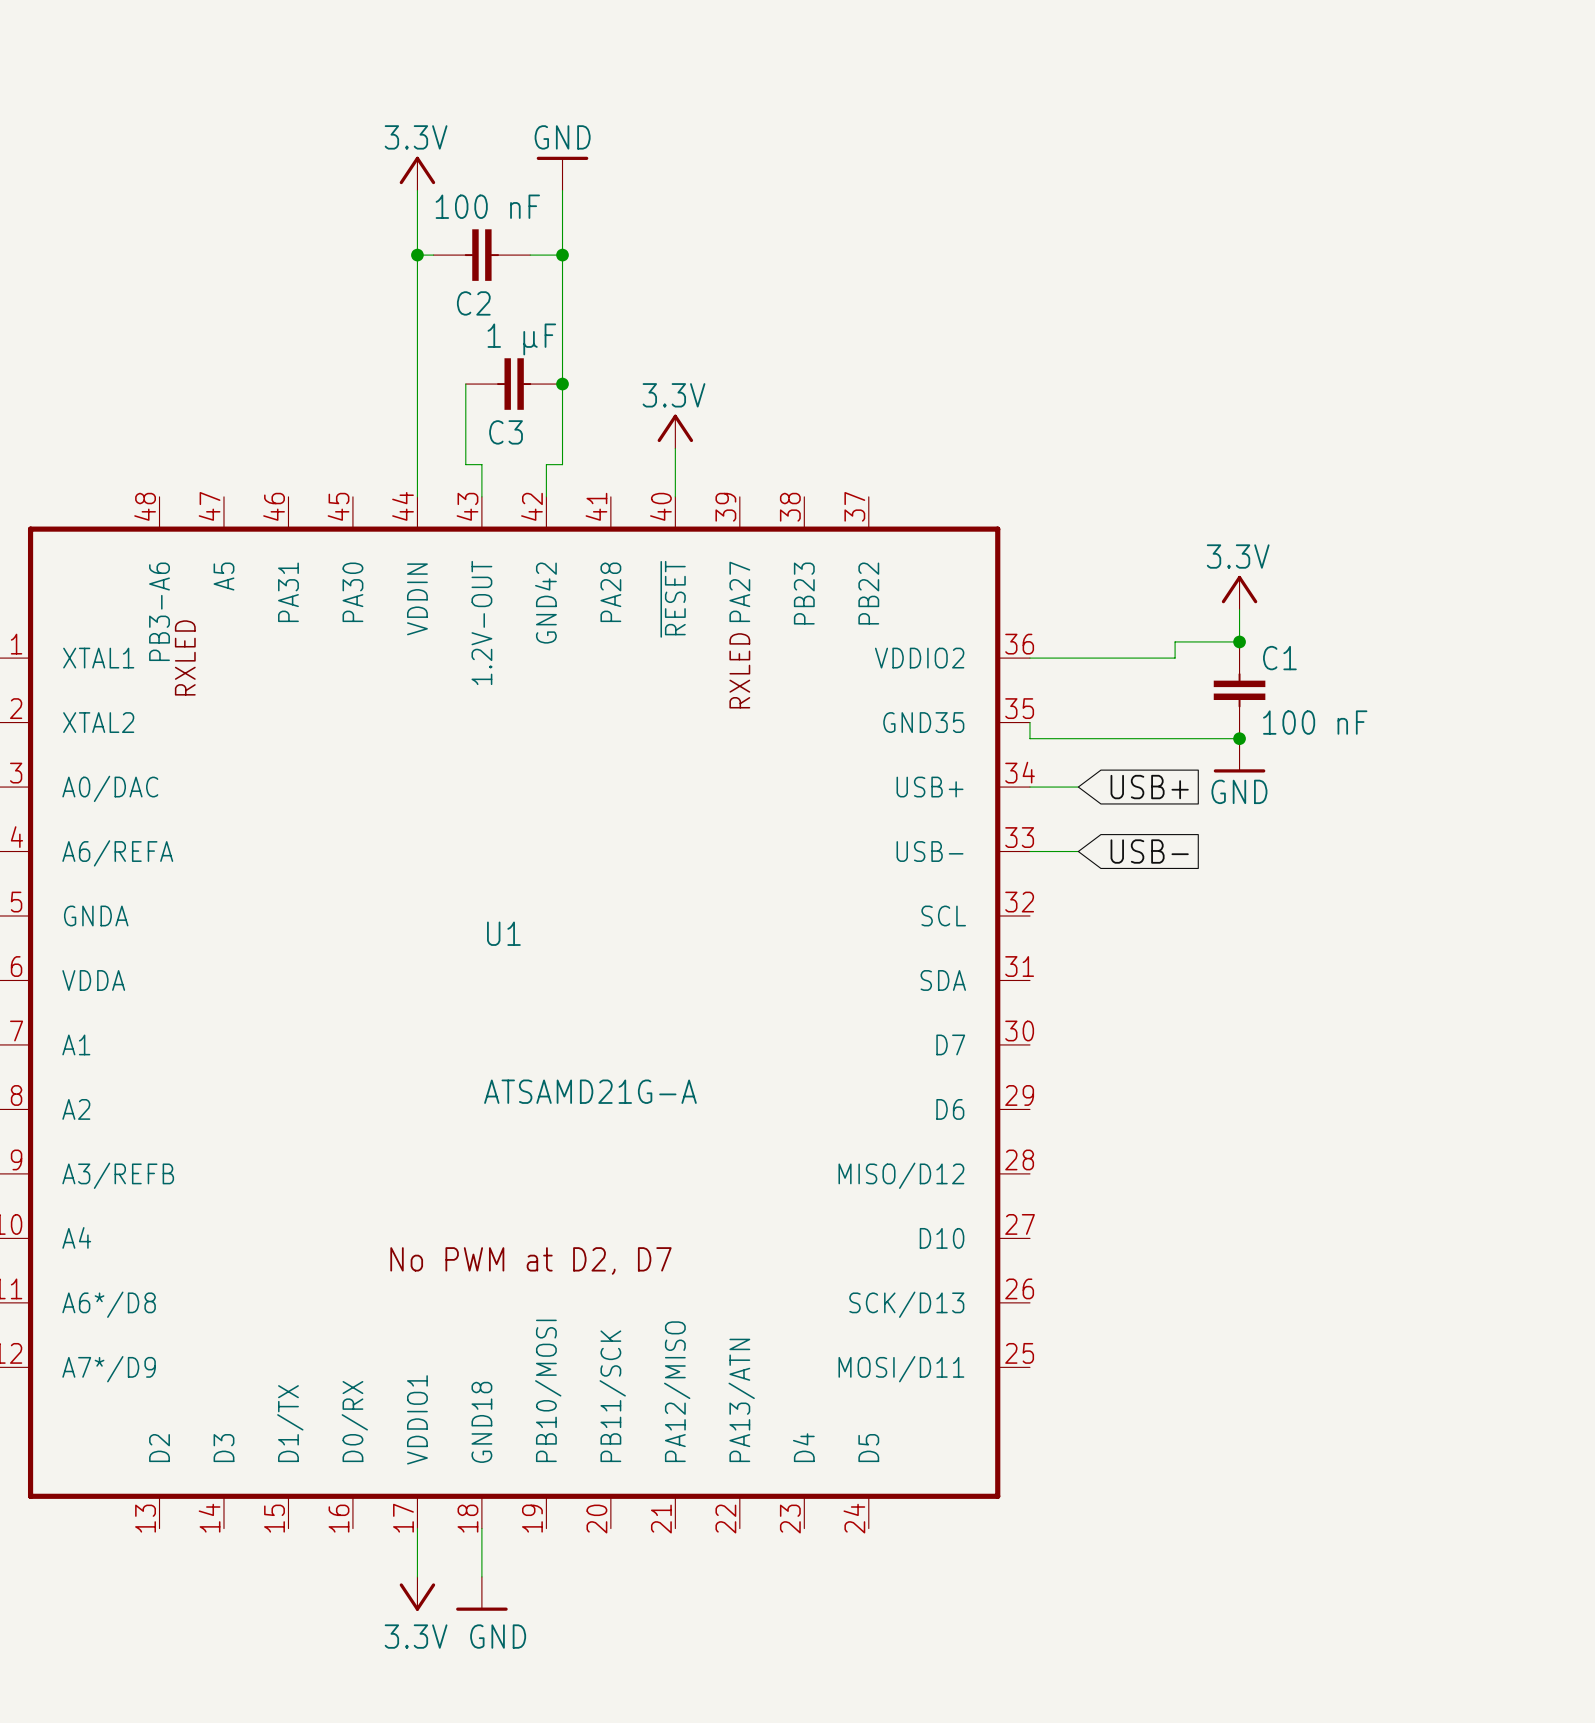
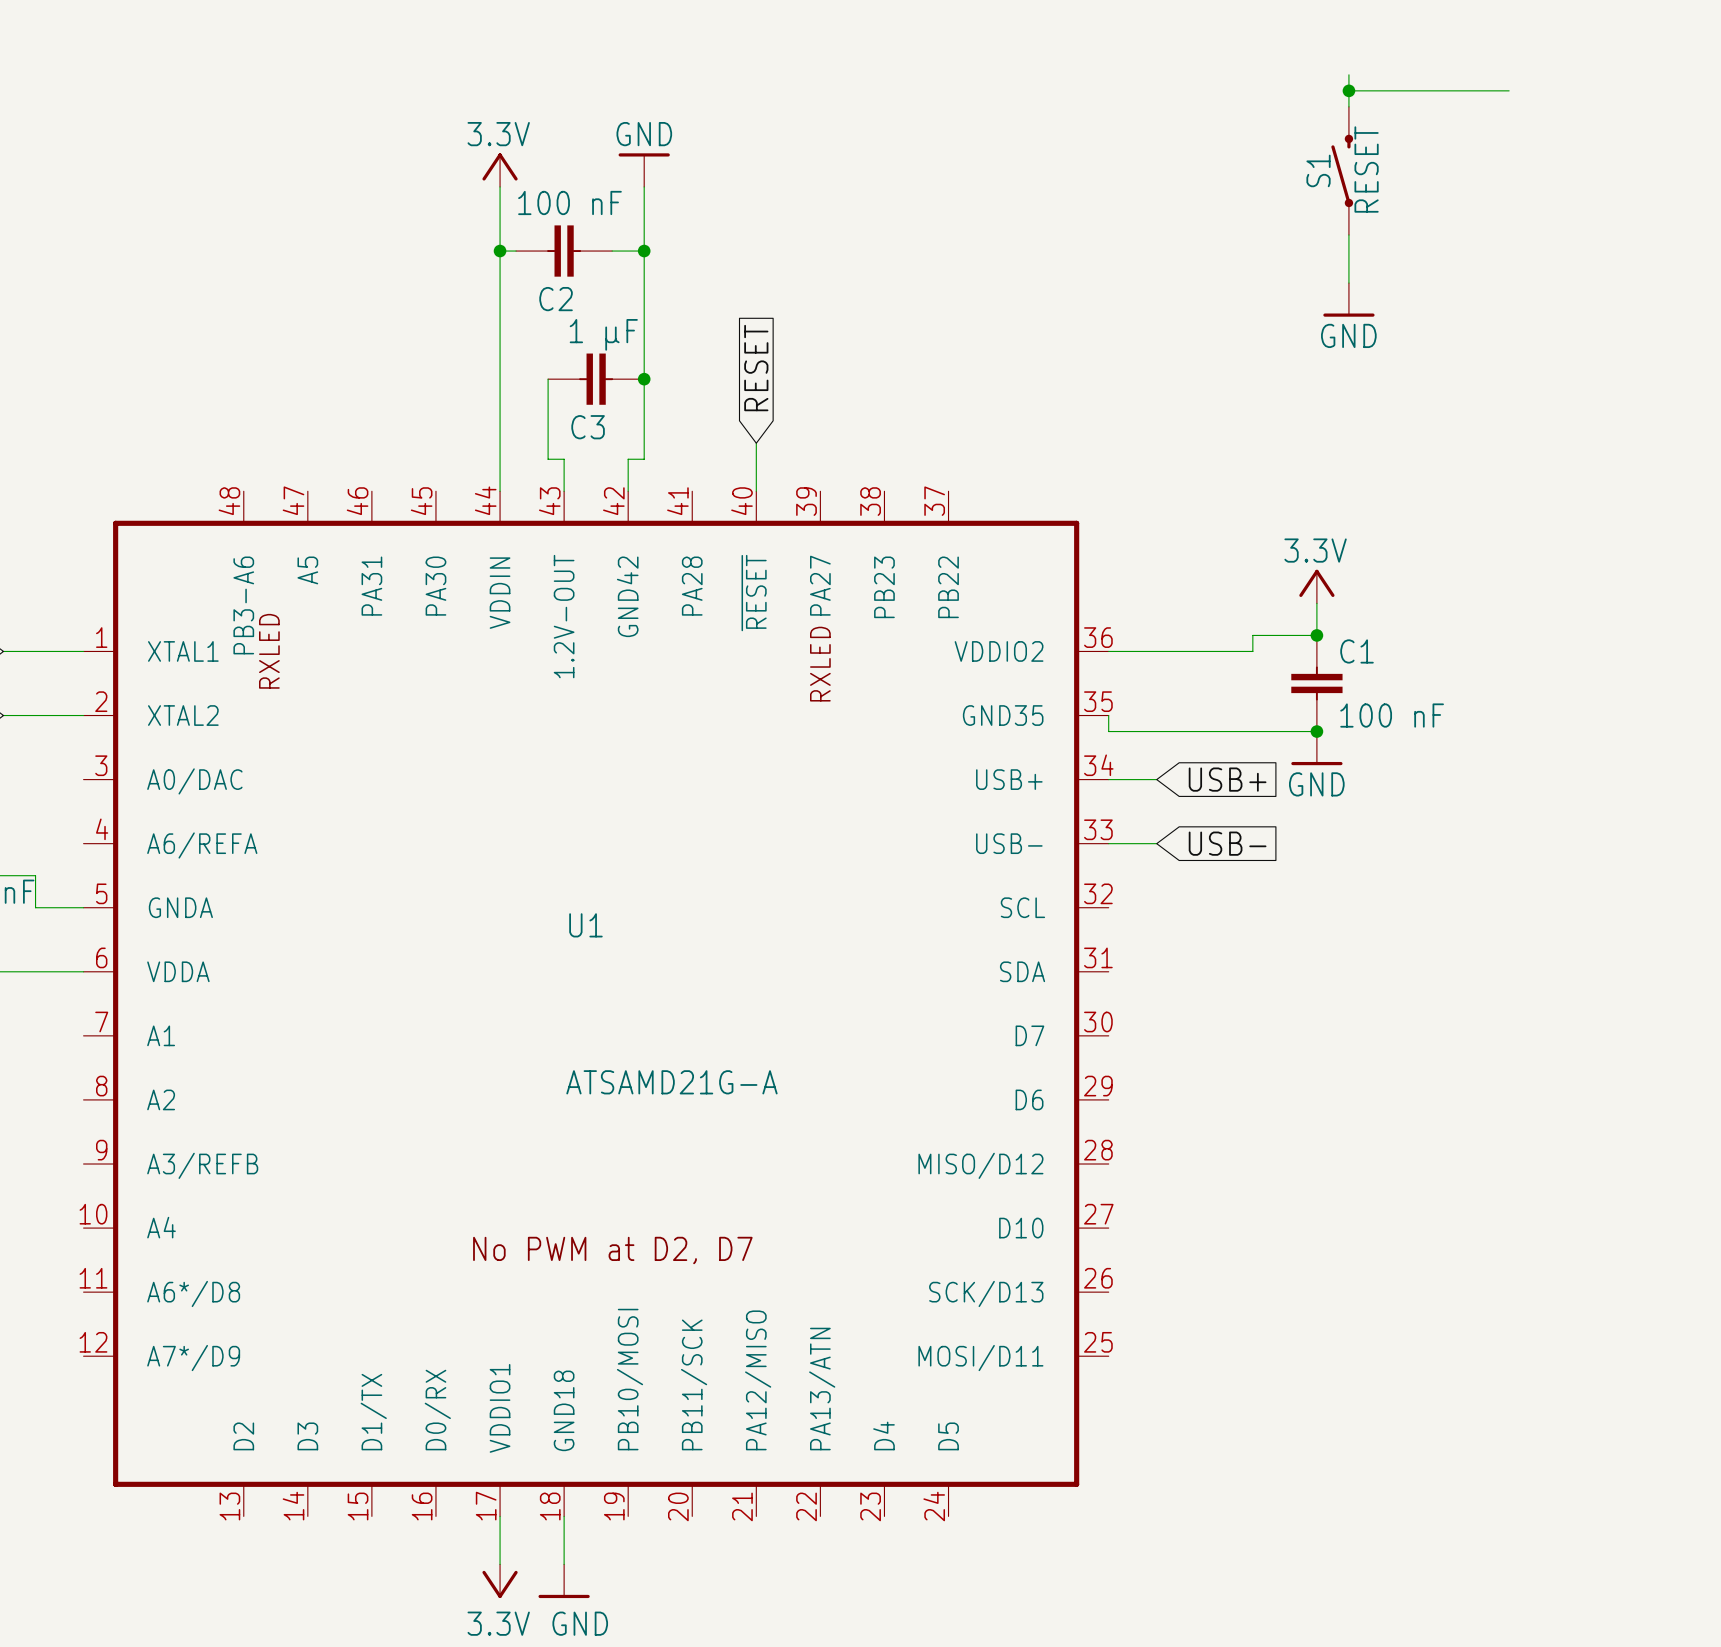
wire: none -> (1348, 74) (1348, 106)
wire: none -> (1348, 90) (1509, 90)
junction: none -> (1348, 90)
S1: none -> RESET (1342, 170)
wire: none -> (1348, 235) (1348, 283)
power symbol: none -> GND (1348, 299)
global label: none -> RESET (756, 368)
power symbol: 3.3V (675, 431) -> none

